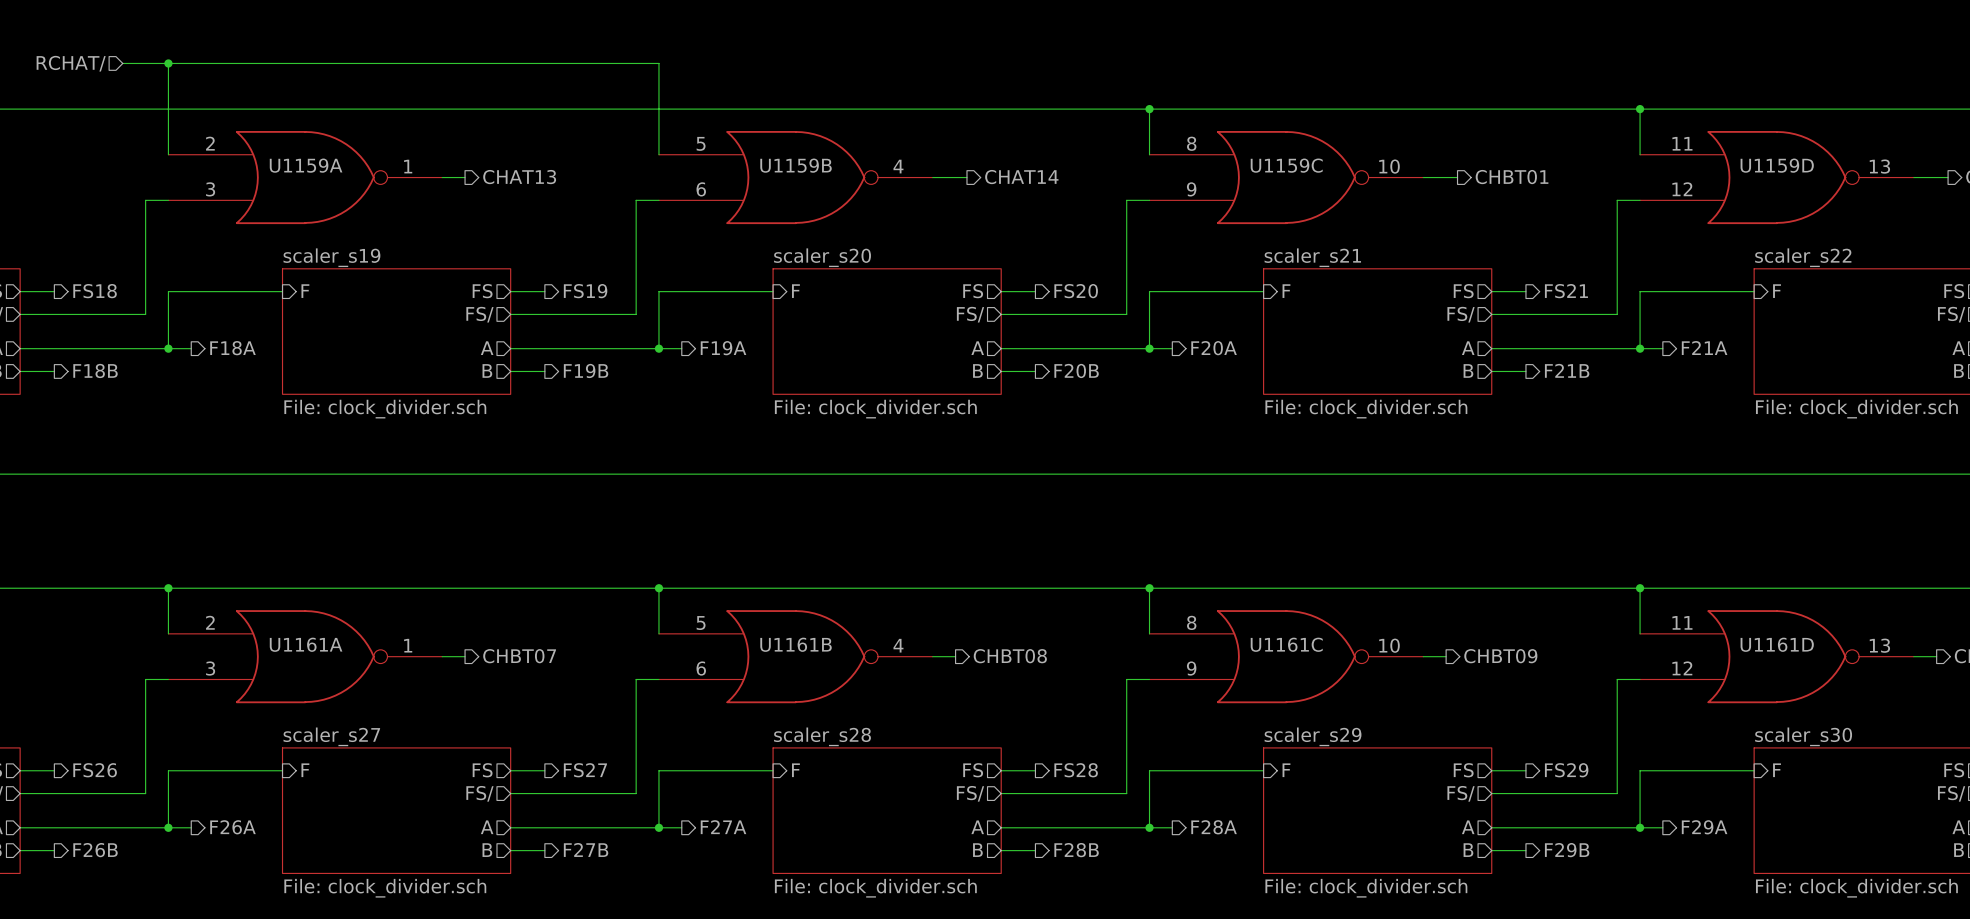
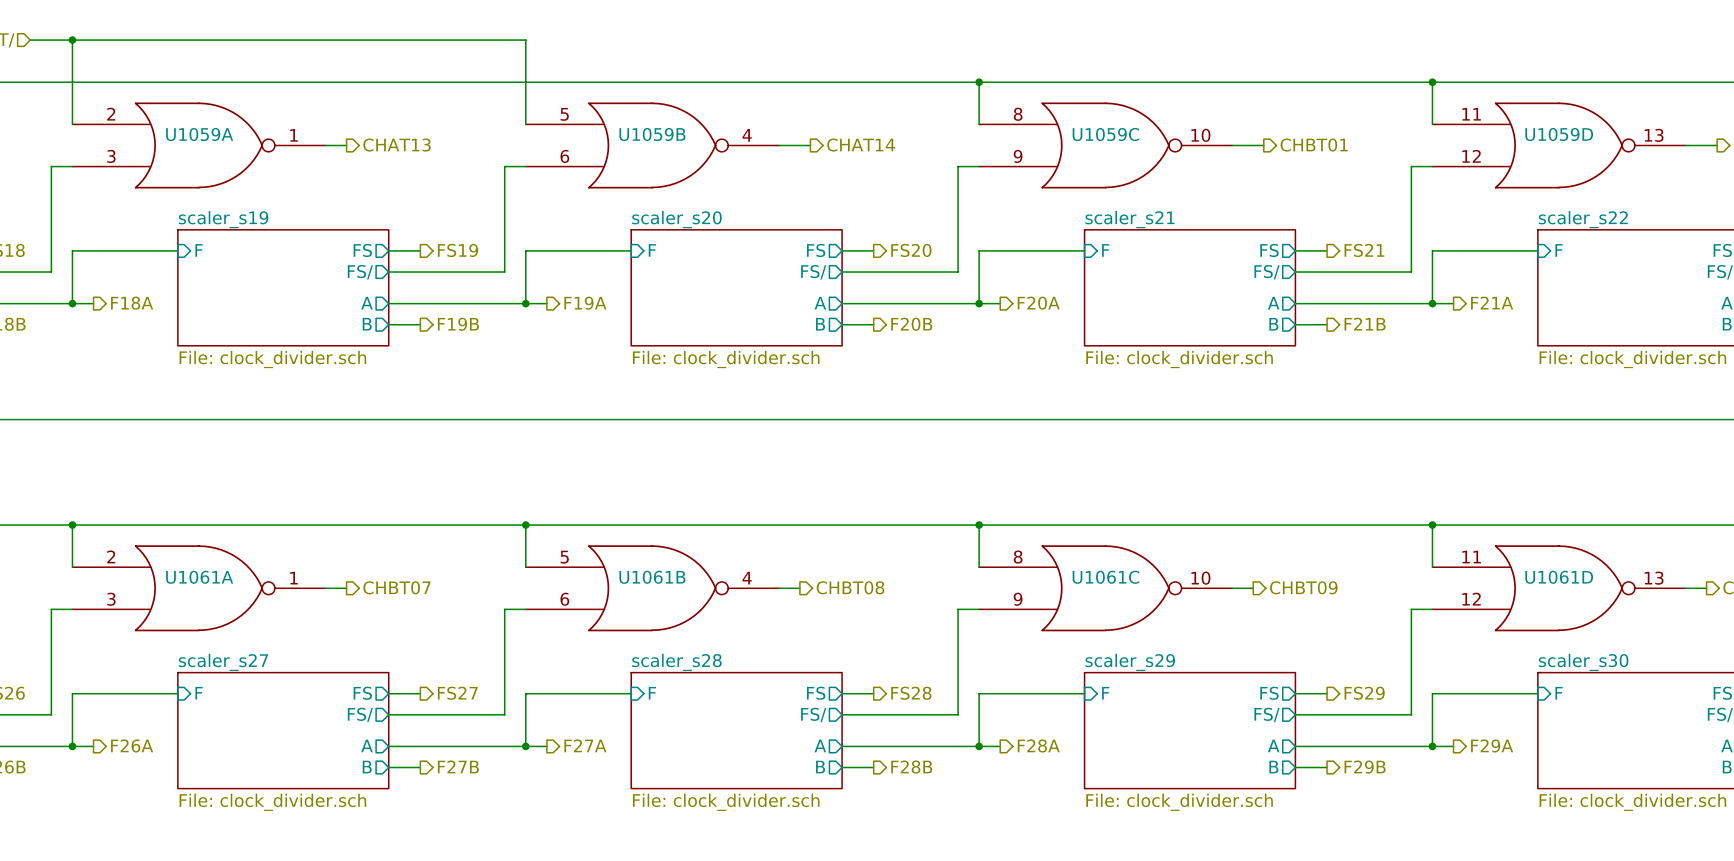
U1159A name: U1159A (306, 165) -> U1059A (199, 134)
U1159B name: U1159B (796, 165) -> U1059B (652, 134)
U1159C name: U1159C (1286, 165) -> U1059C (1105, 134)
U1159D name: U1159D (1777, 165) -> U1059D (1559, 134)
U1161A name: U1161A (306, 644) -> U1061A (199, 577)
U1161B name: U1161B (796, 644) -> U1061B (652, 577)
U1161C name: U1161C (1286, 644) -> U1061C (1105, 577)
U1161D name: U1161D (1777, 644) -> U1061D (1559, 577)

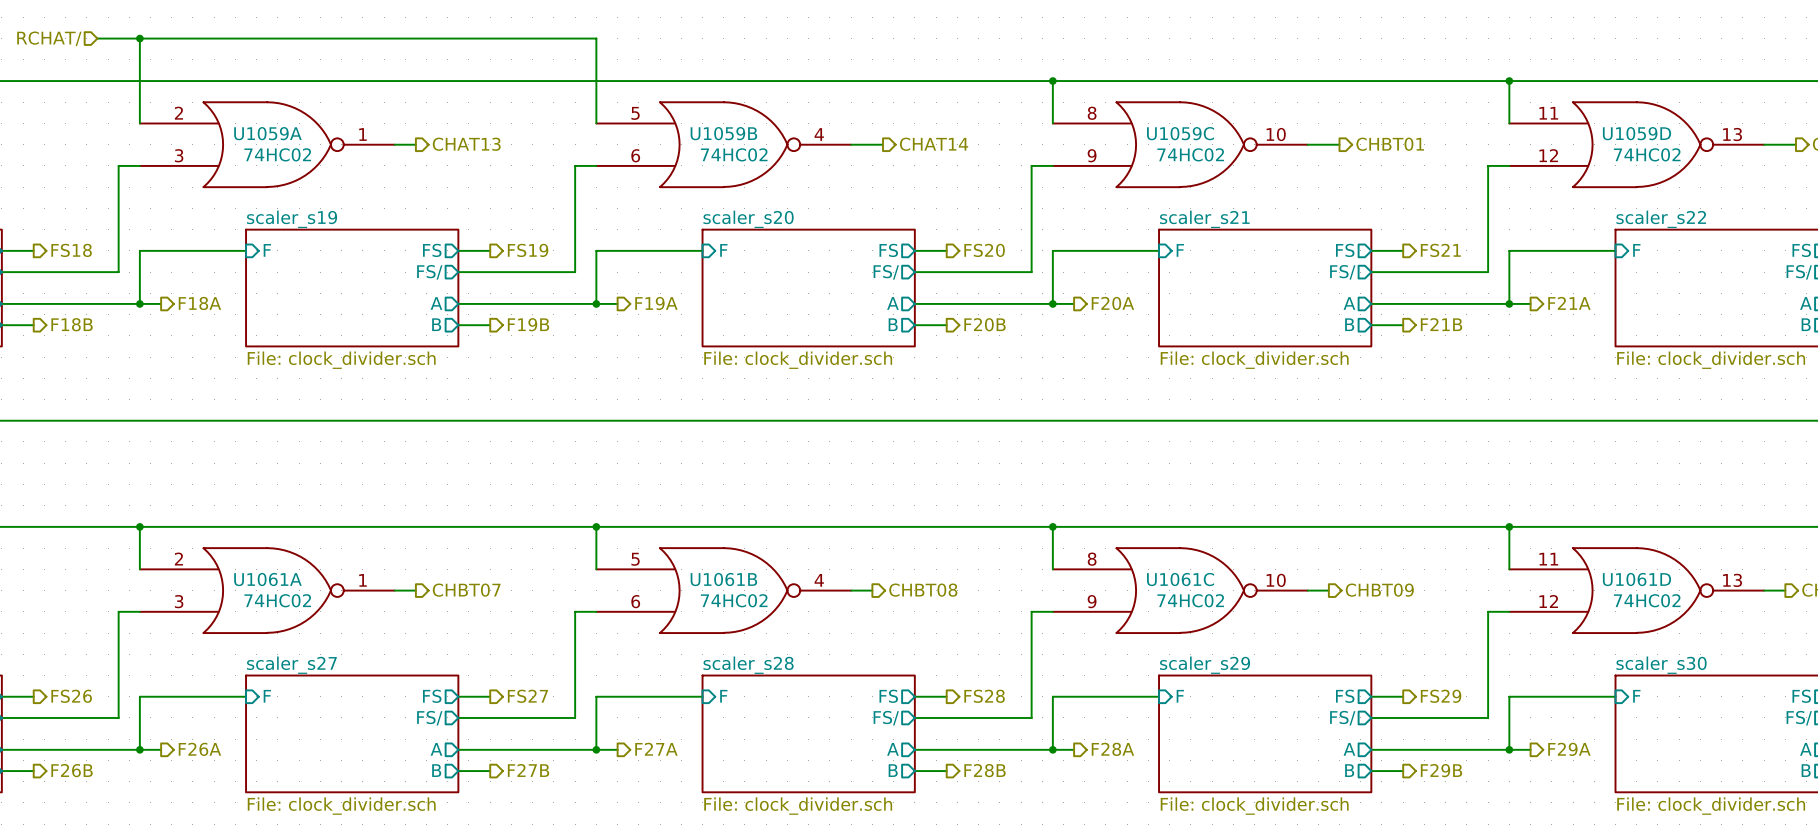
U1059A value: none -> 74HC02 (277, 154)
U1059B value: none -> 74HC02 (734, 154)
U1059C value: none -> 74HC02 (1190, 154)
U1059D value: none -> 74HC02 (1647, 154)
U1061A value: none -> 74HC02 (277, 600)
U1061B value: none -> 74HC02 (734, 600)
U1061C value: none -> 74HC02 (1190, 600)
U1061D value: none -> 74HC02 (1647, 600)

